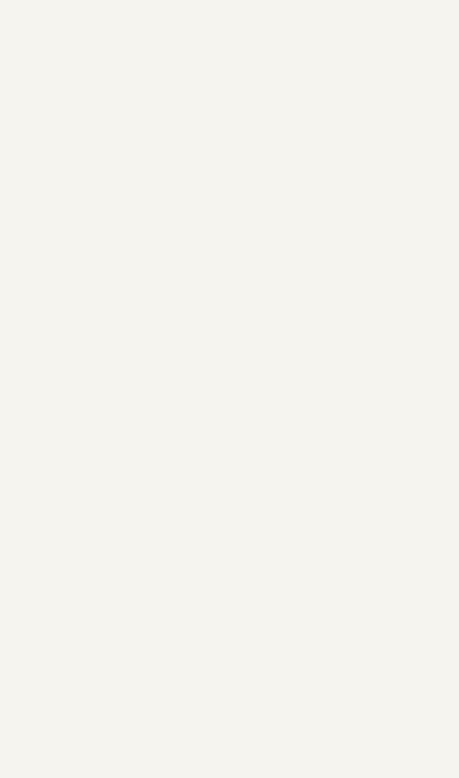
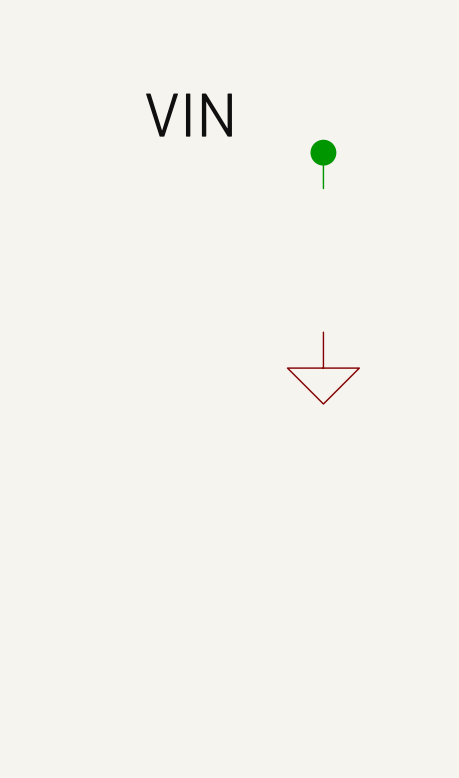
label: none -> VIN (189, 115)
wire: none -> (323, 152) (323, 188)
junction: none -> (323, 152)
power symbol: none -> (323, 368)

